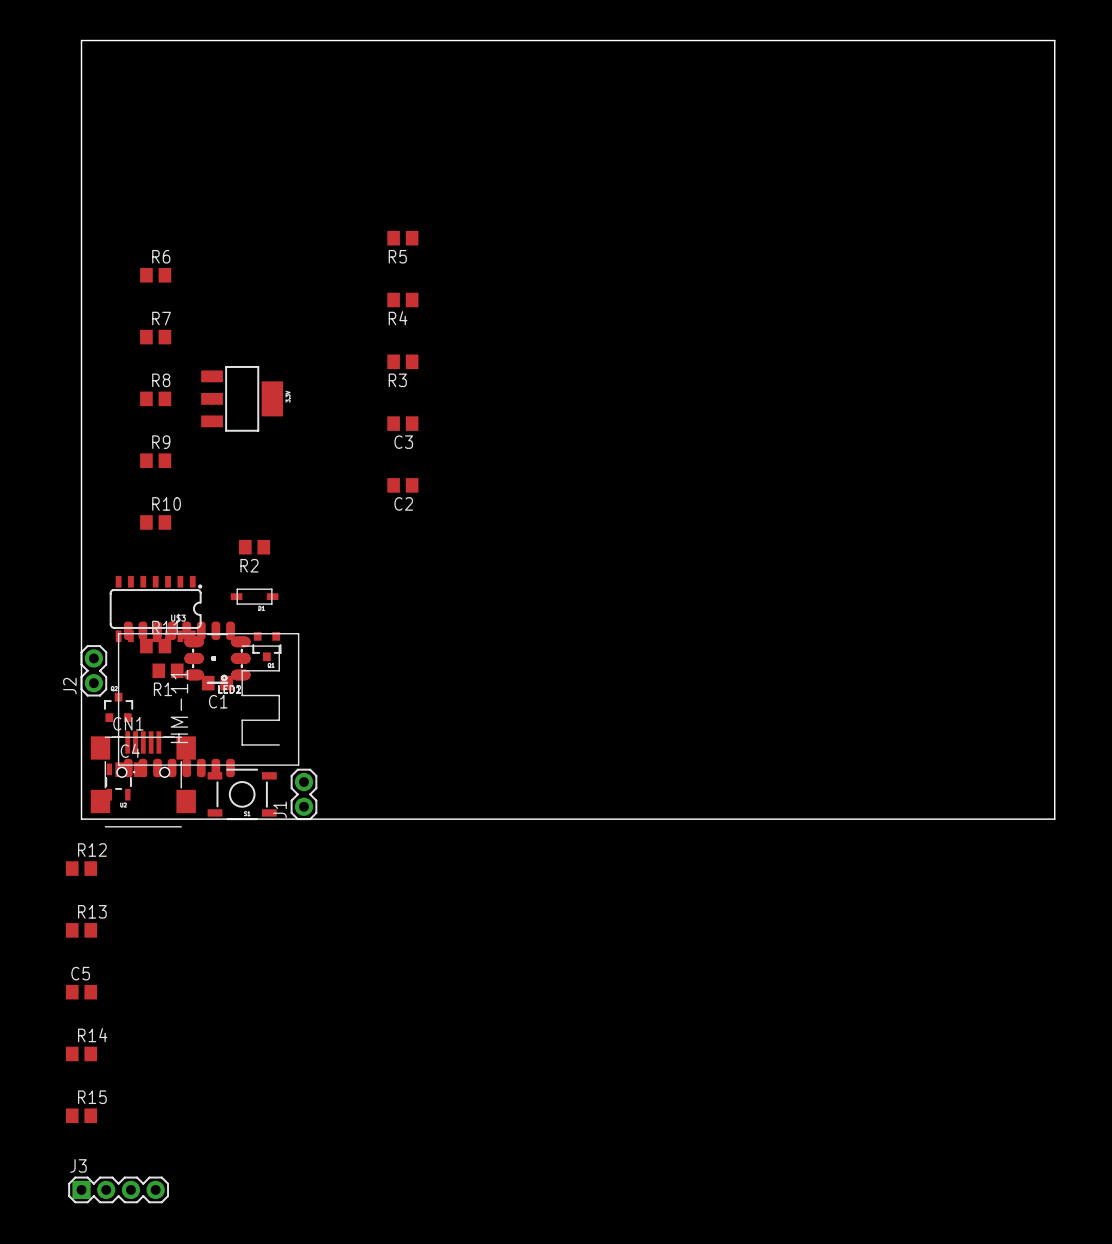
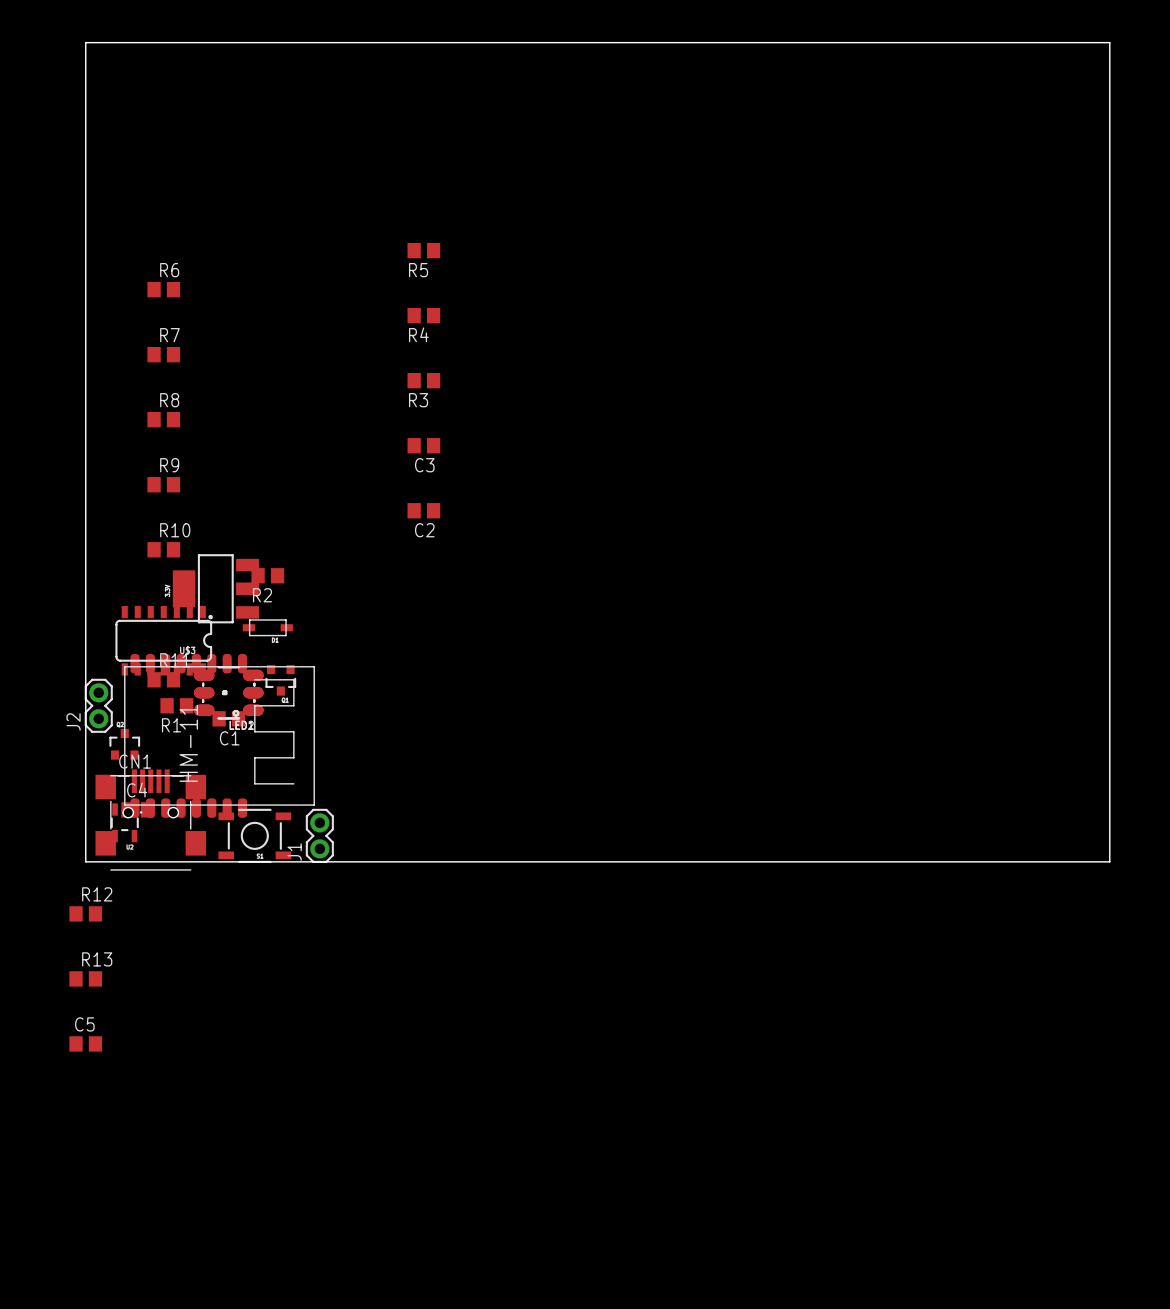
part rotation: 0° (242, 398) -> 180° (215, 588)
part position: (242, 398) -> (215, 588)
R14: (81, 1053) -> none
R15: (81, 1115) -> none
J3: (118, 1189) -> none

